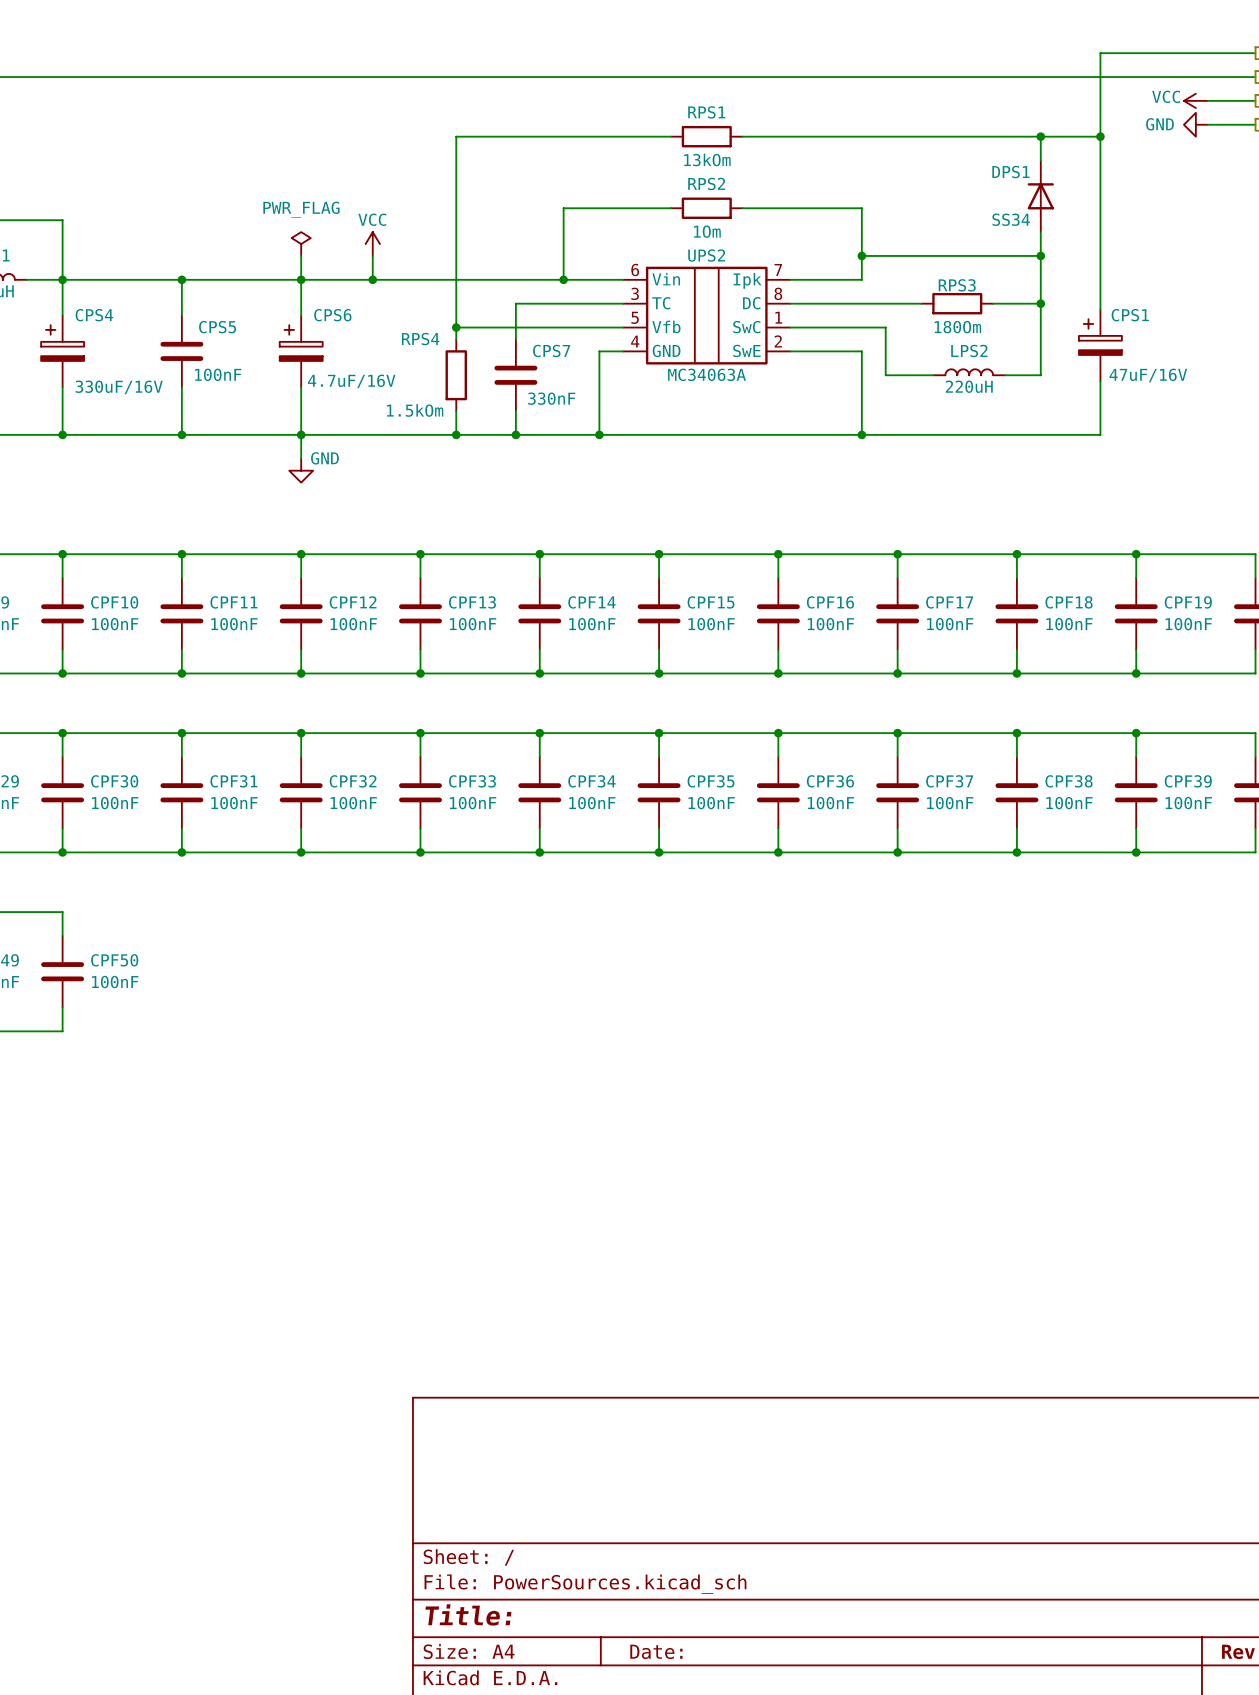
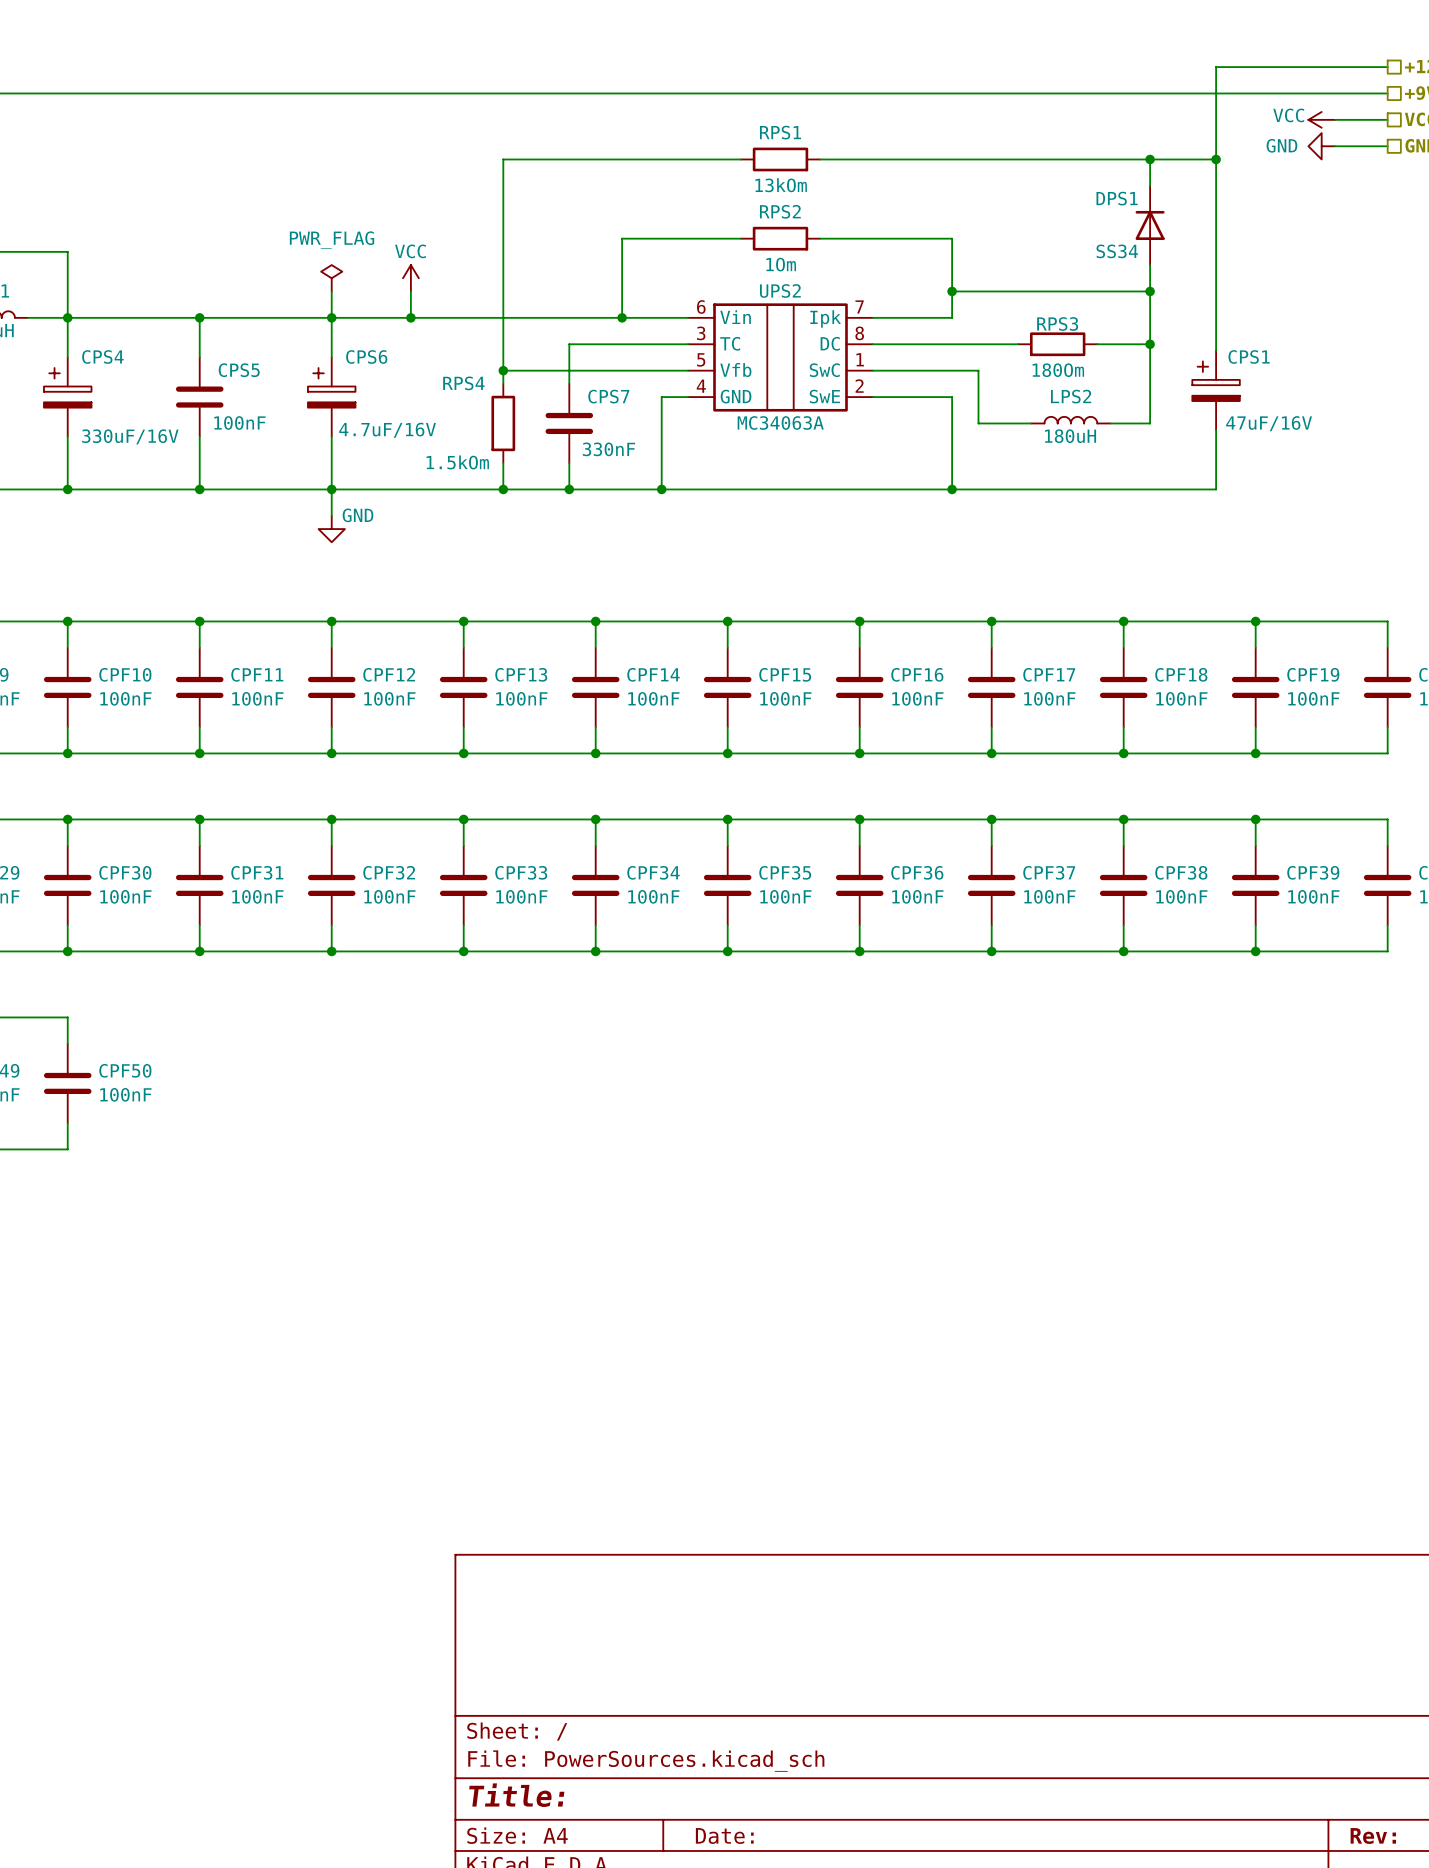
LPS2 value: 220uH (969, 386) -> 180uH (1070, 436)

